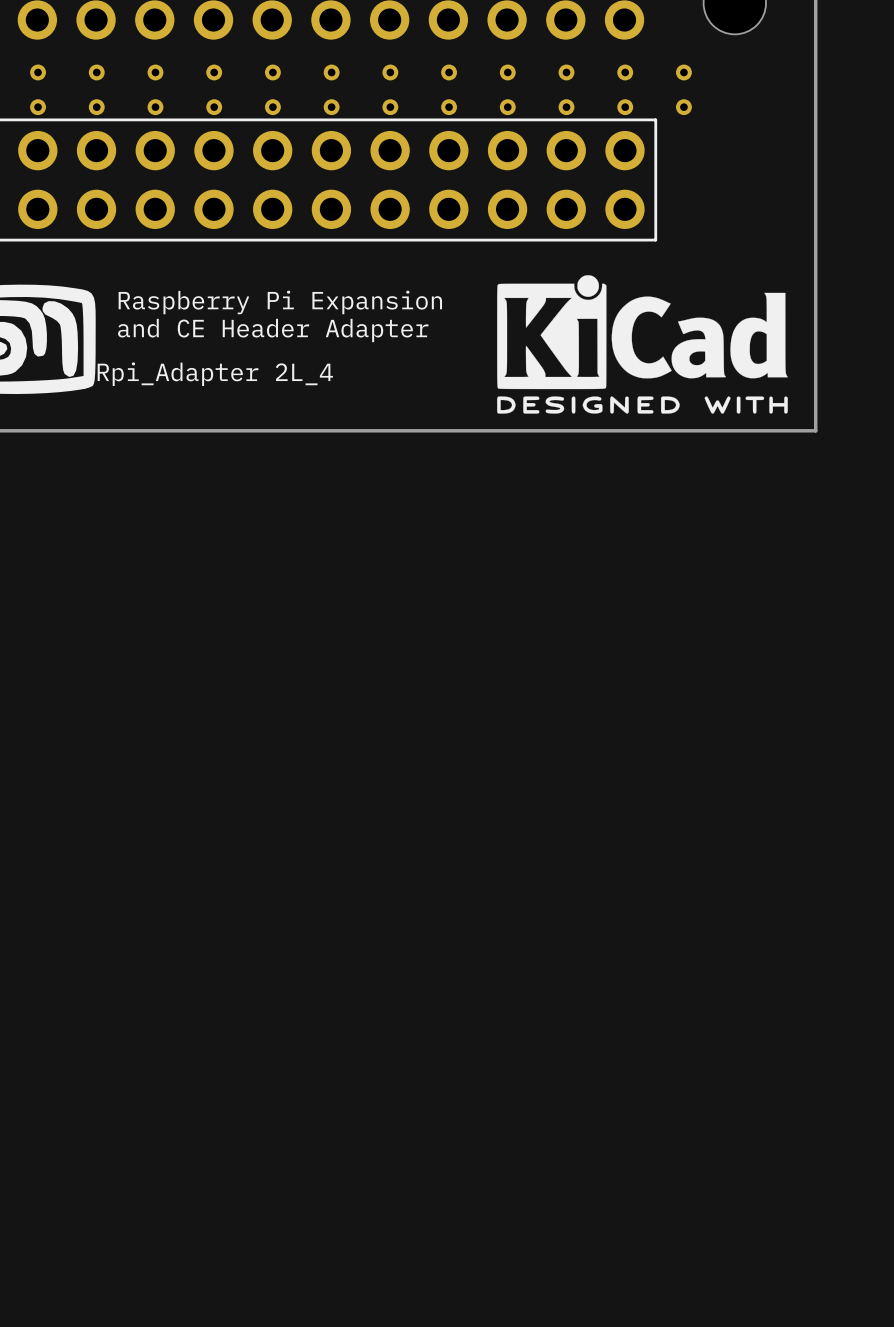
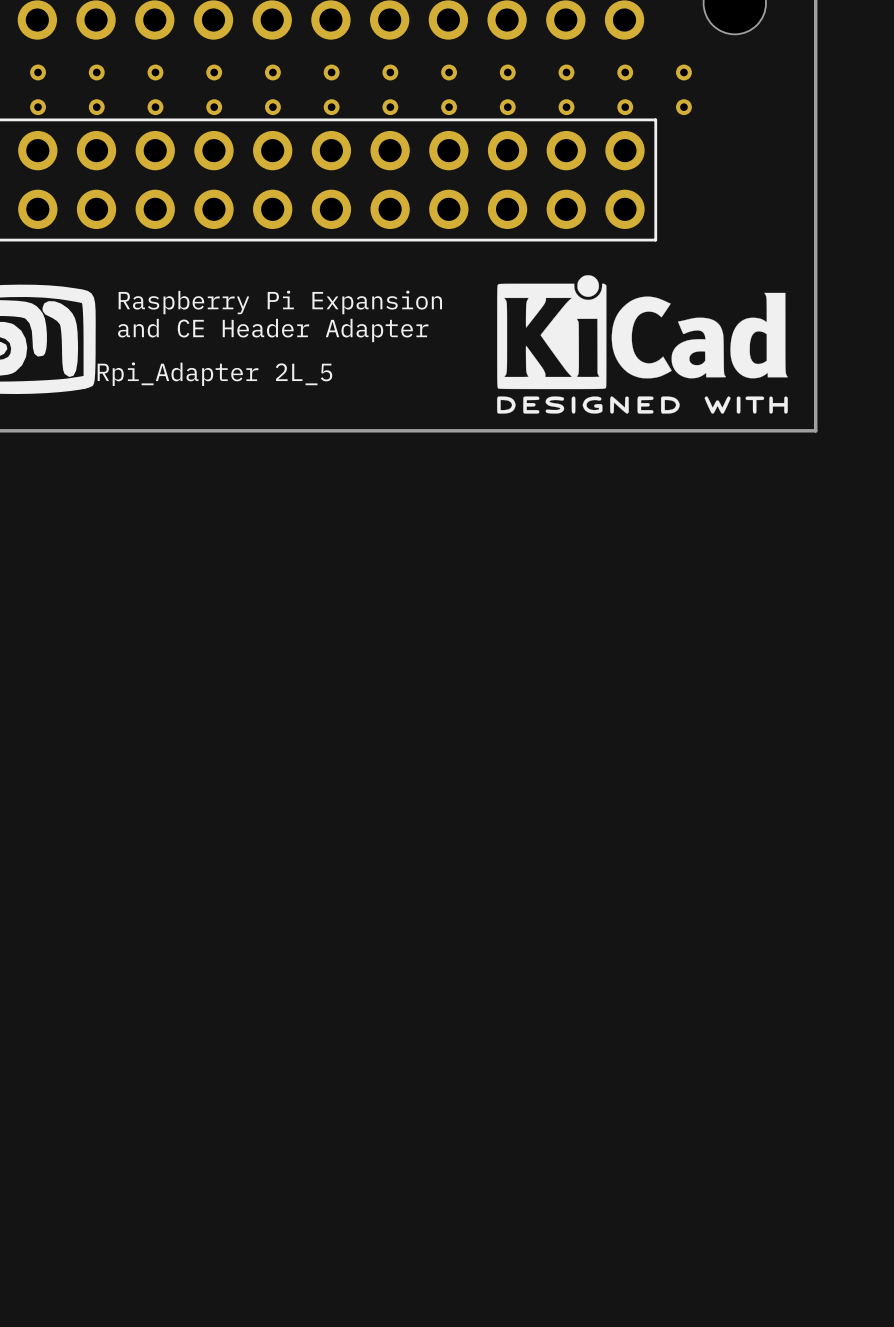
text: Rpi_Adapter 2L_4 (215, 374) -> Rpi_Adapter 2L_5 (214, 374)

